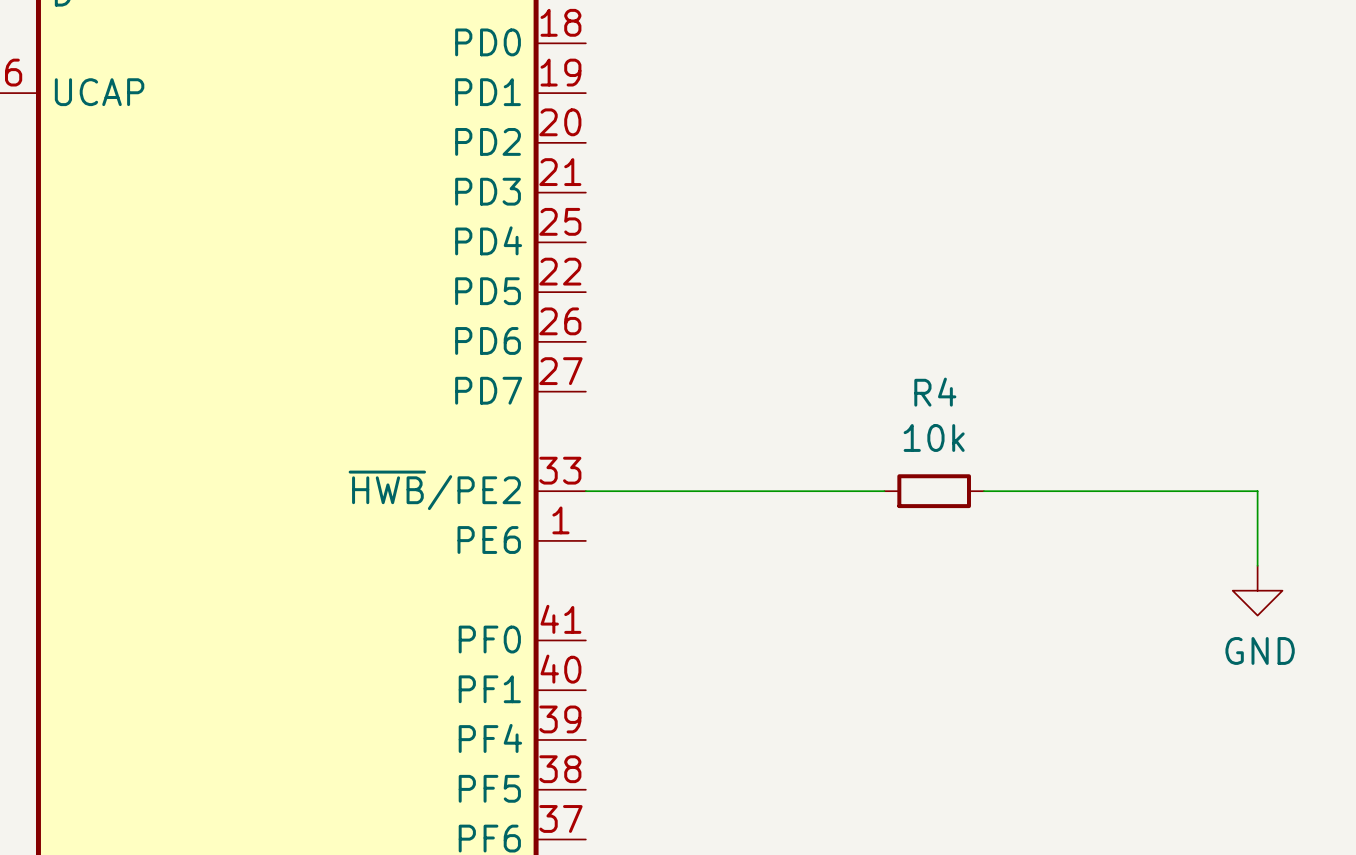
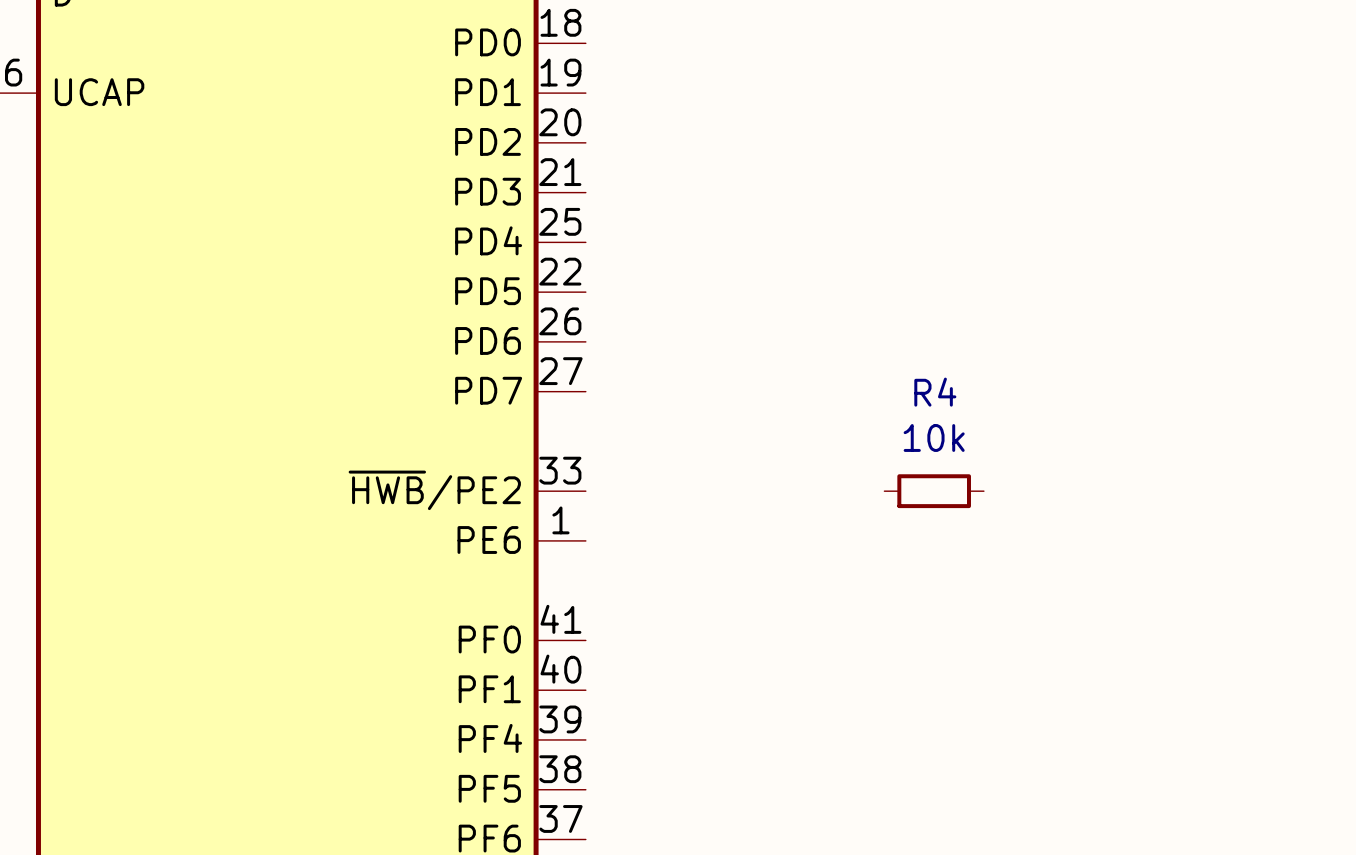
wire: (585, 491) (884, 491) -> none
wire: (983, 491) (1257, 491) (1257, 565) -> none
power symbol: GND (1257, 590) -> none

